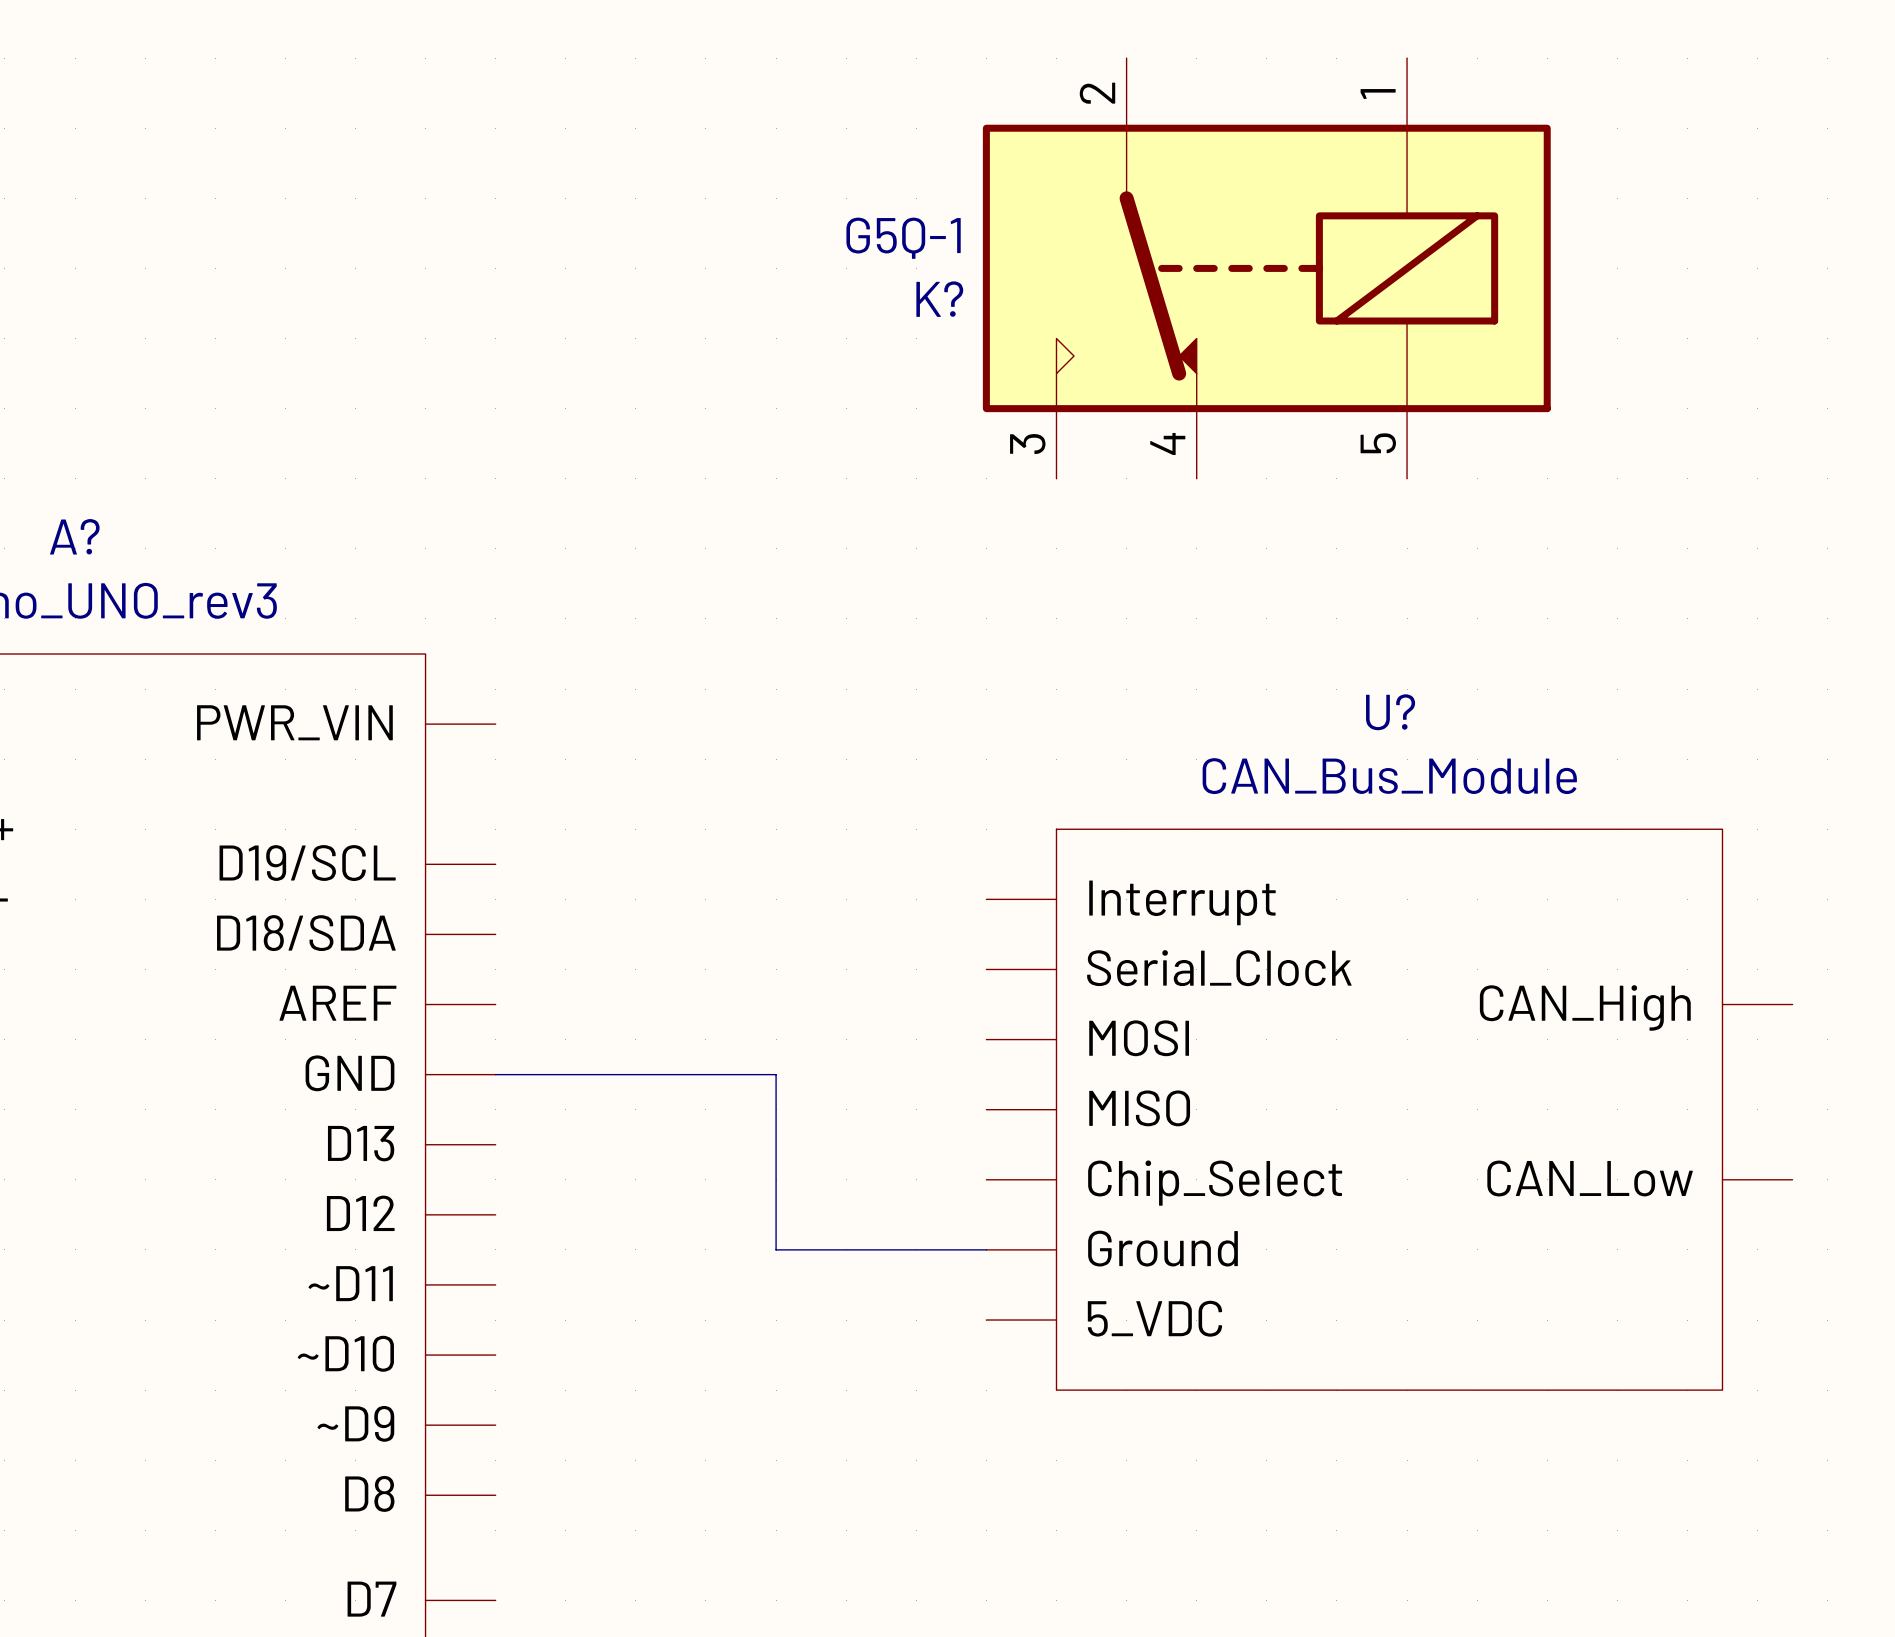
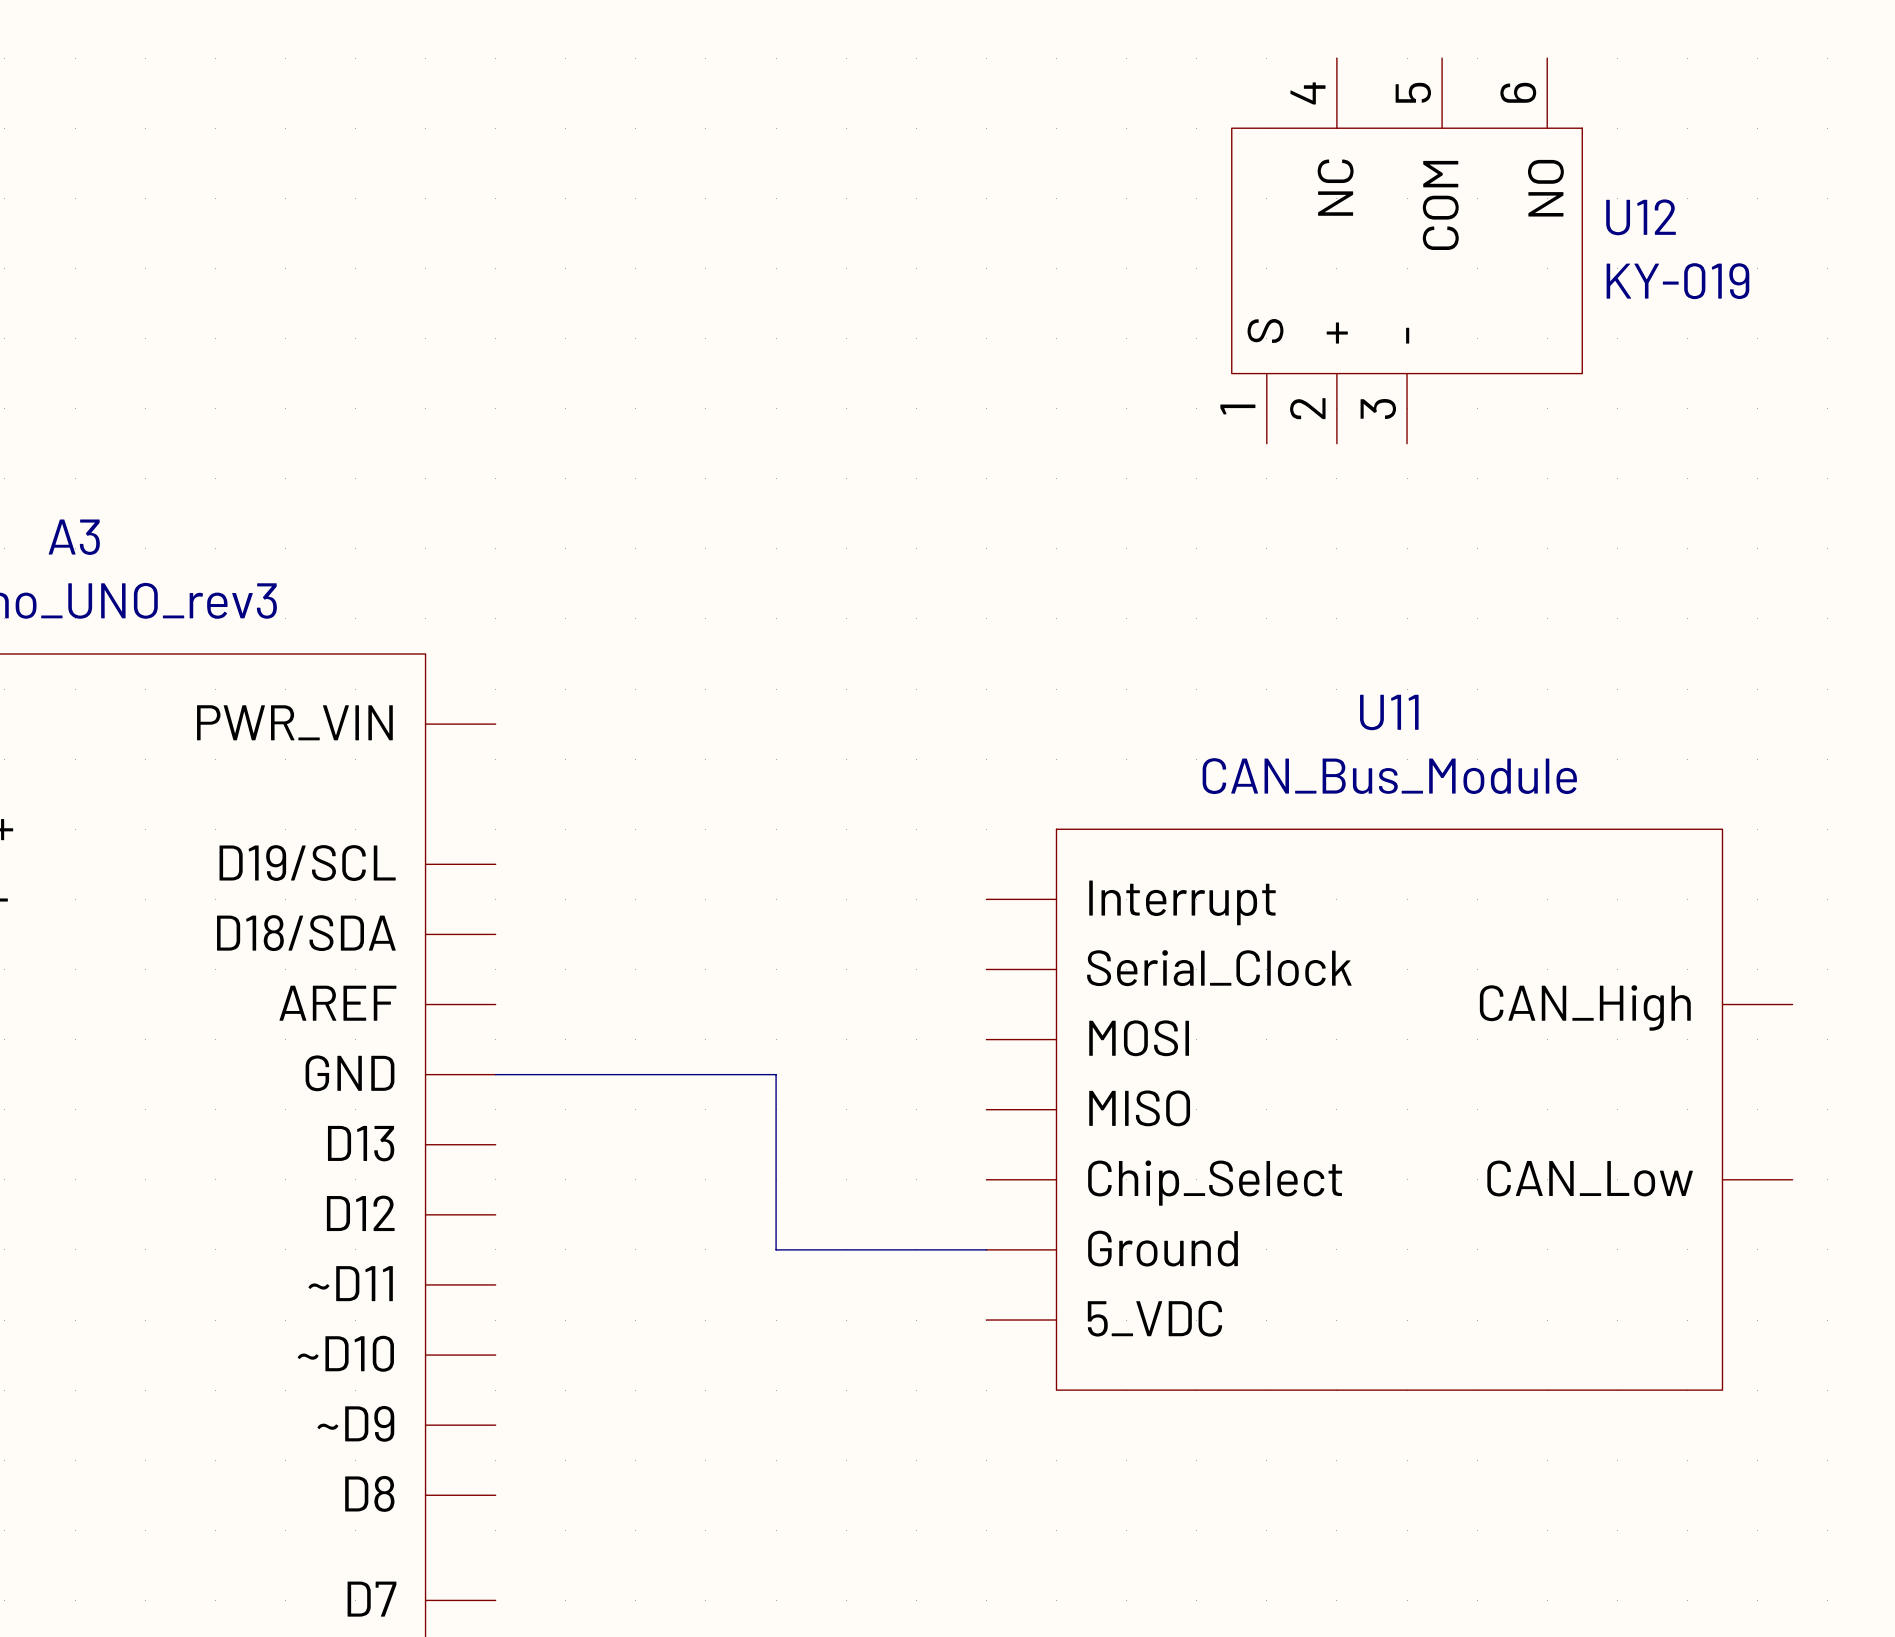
U12: none -> KY-019 (1407, 250)
K?: G5Q-1 (1266, 268) -> none
A? name: A? (74, 536) -> A3 (74, 537)
U? name: U? (1390, 712) -> U11 (1389, 712)

